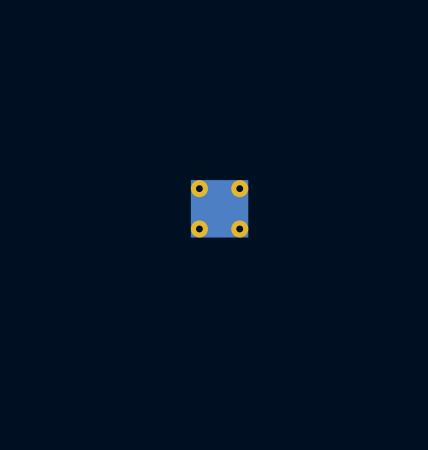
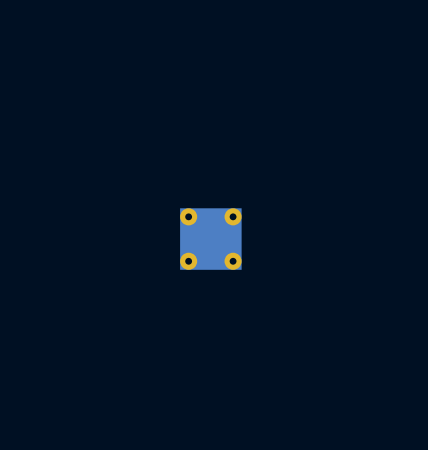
part footprint: [190, 180, 249, 238] -> [180, 208, 242, 270]

